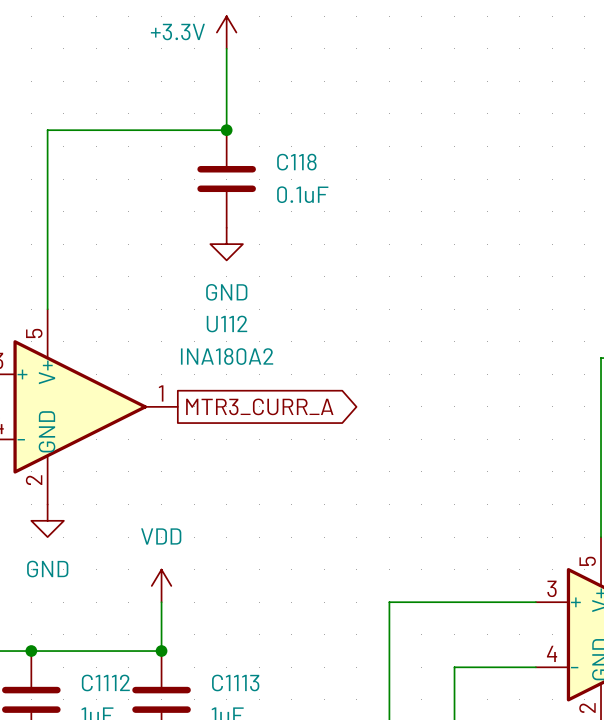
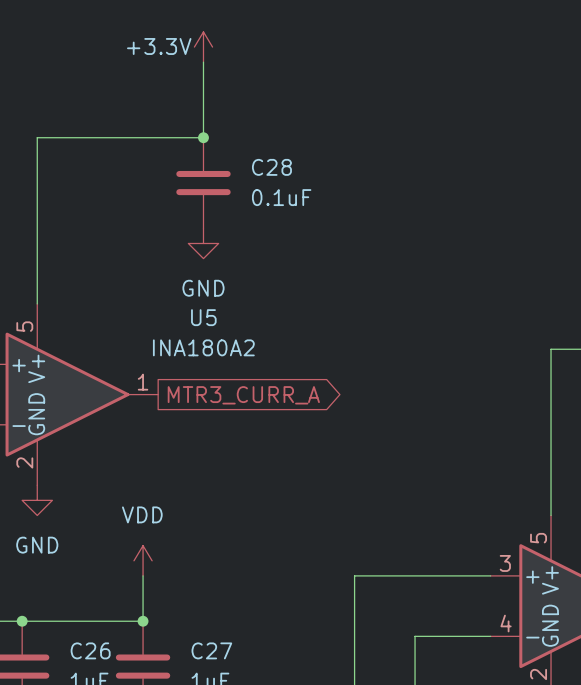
C118 name: C118 (296, 162) -> C28 (271, 167)
U112 name: U112 (226, 323) -> U5 (203, 317)
C1112 name: C1112 (105, 682) -> C26 (90, 650)
C1113 name: C1113 (235, 682) -> C27 (211, 650)

